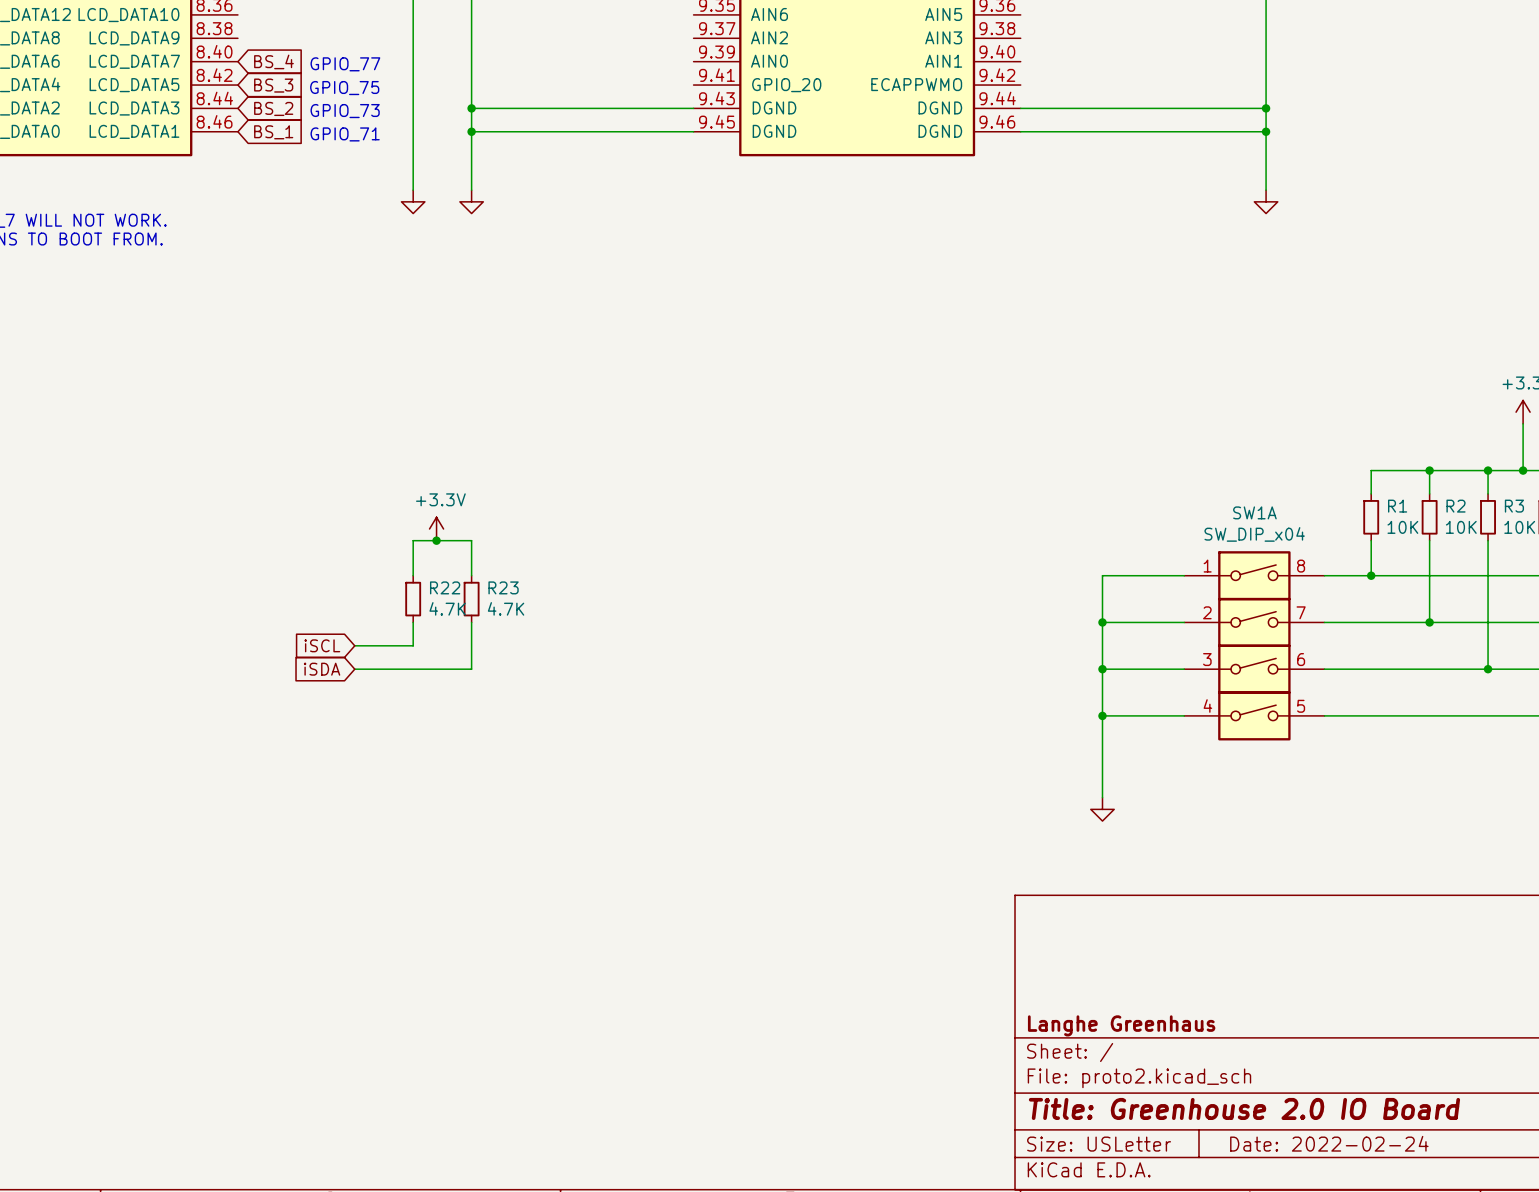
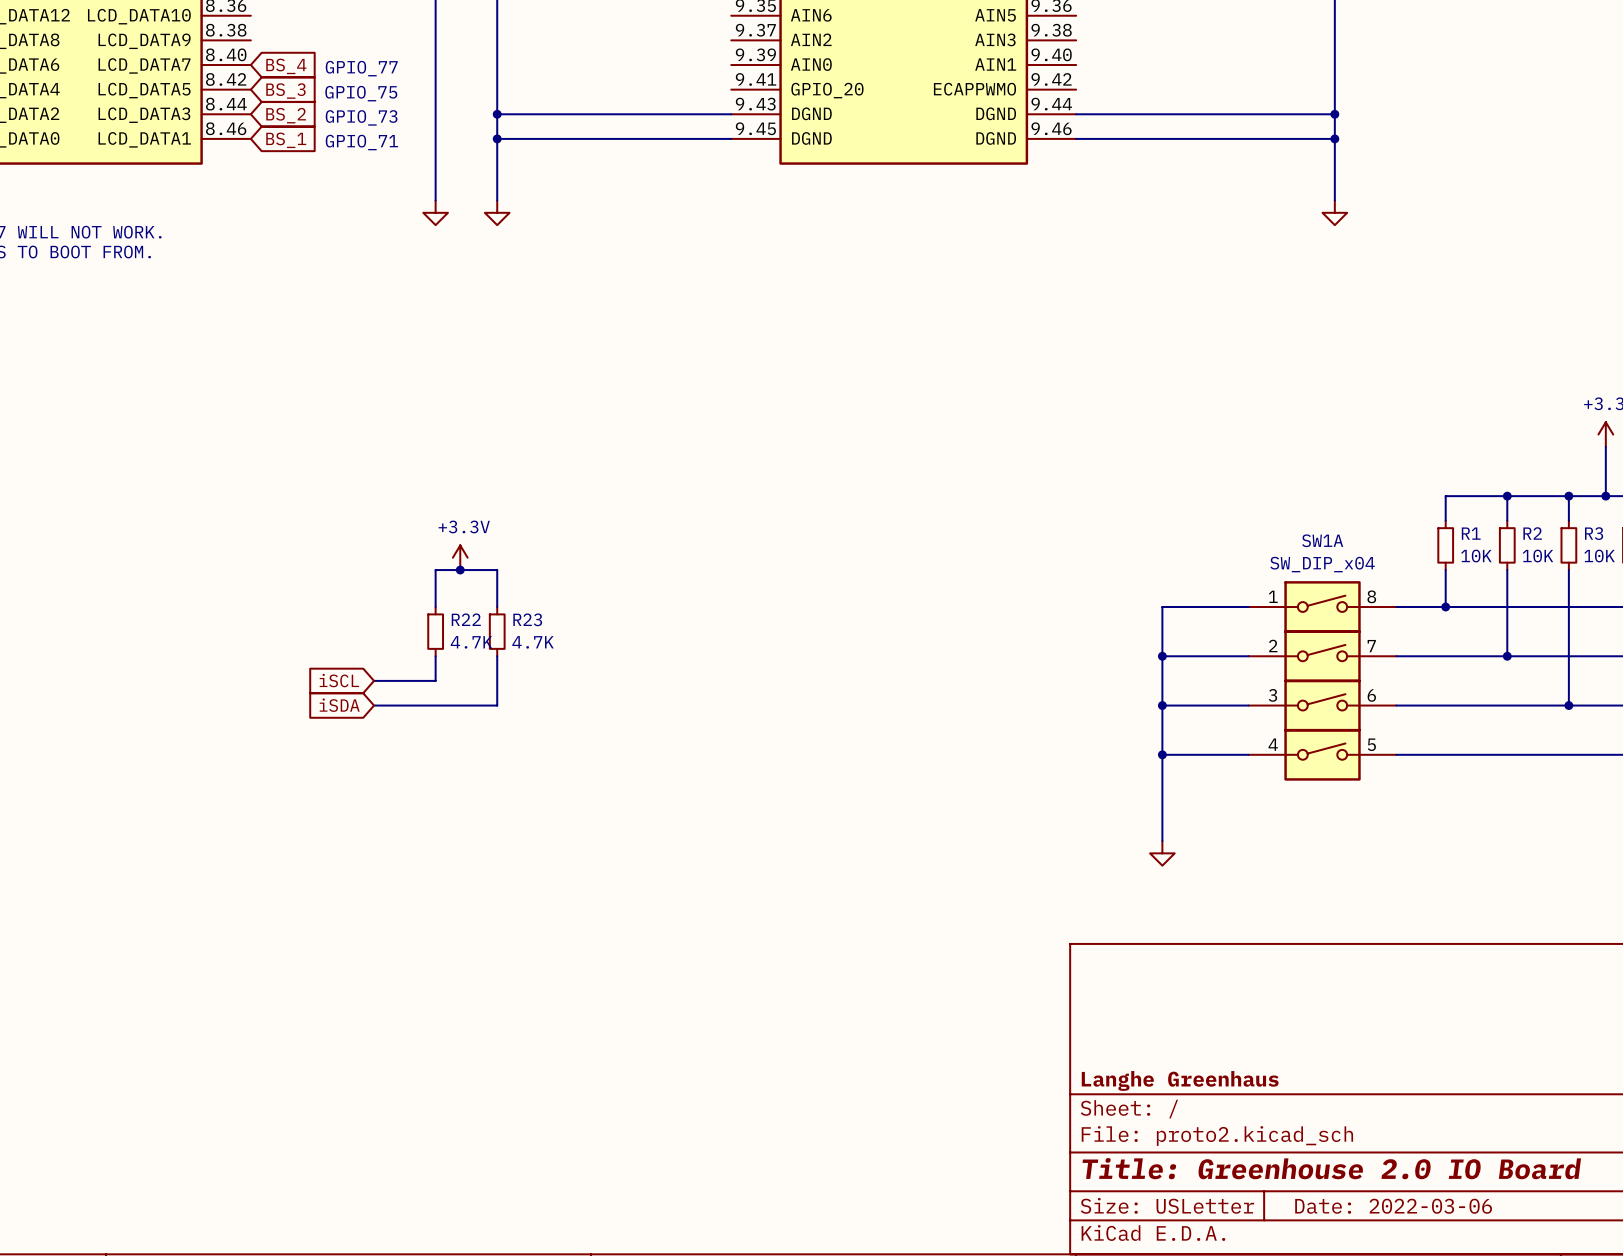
title block: Date: 2022-02-24 (1329, 1143) -> Date: 2022-03-06 (1393, 1206)

